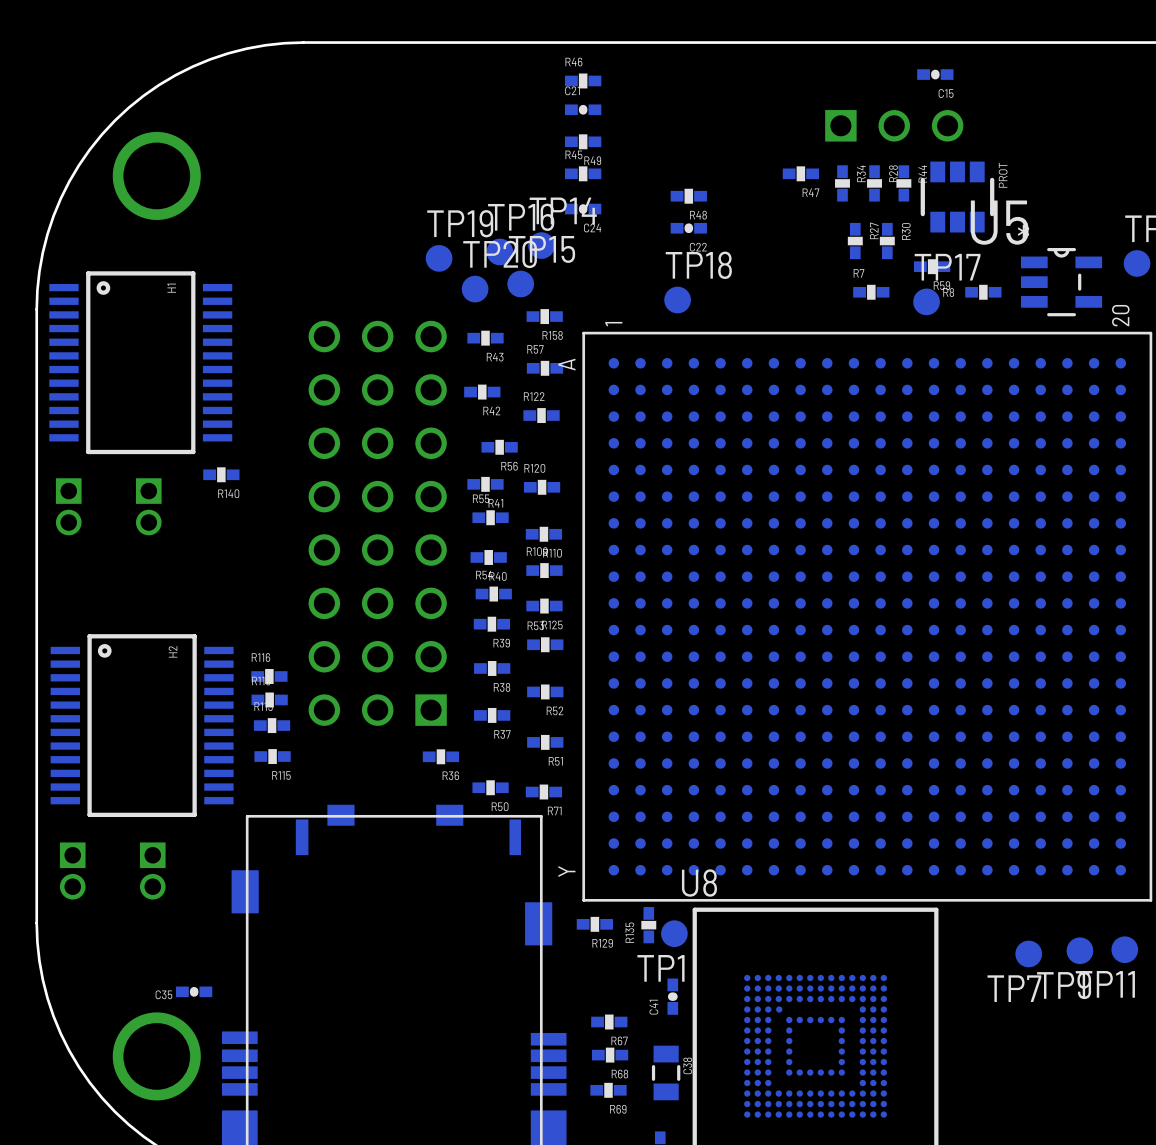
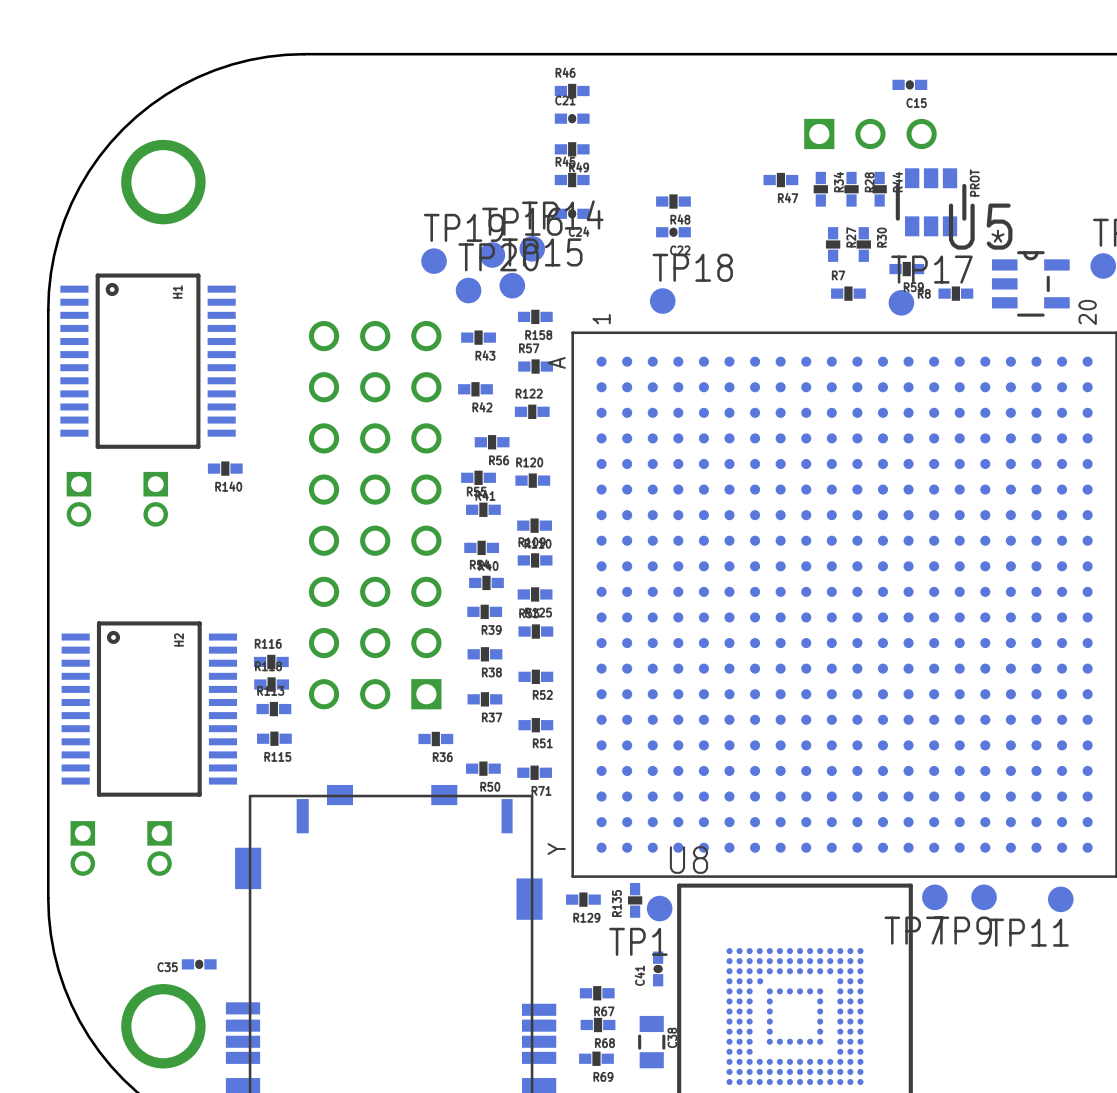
TP11 position: (1124, 949) -> (1060, 899)
TP9 position: (1079, 950) -> (984, 897)
TP7 position: (1028, 953) -> (934, 897)

